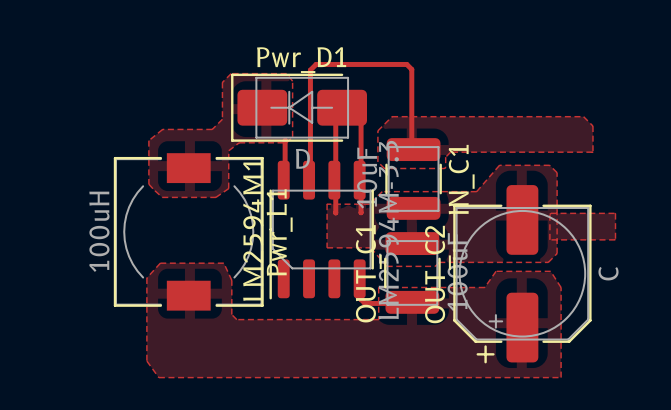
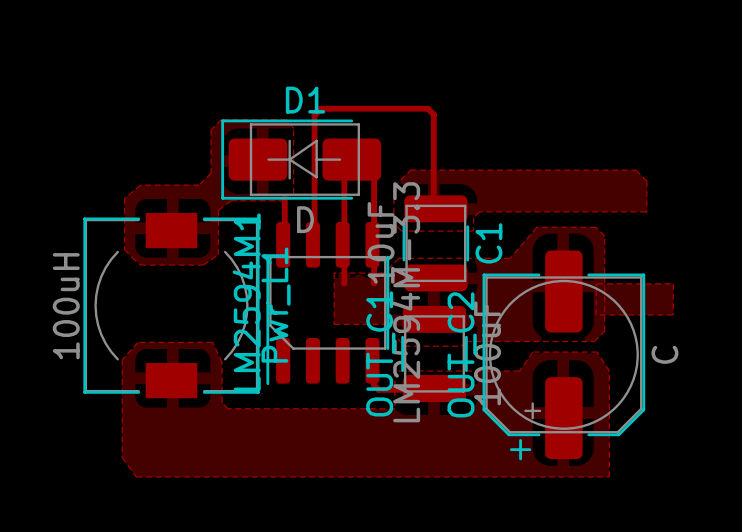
Pwr_D1 name: Pwr_D1 (301, 60) -> D1 (305, 100)
IN_C1 name: IN_C1 (461, 179) -> C1 (488, 243)

